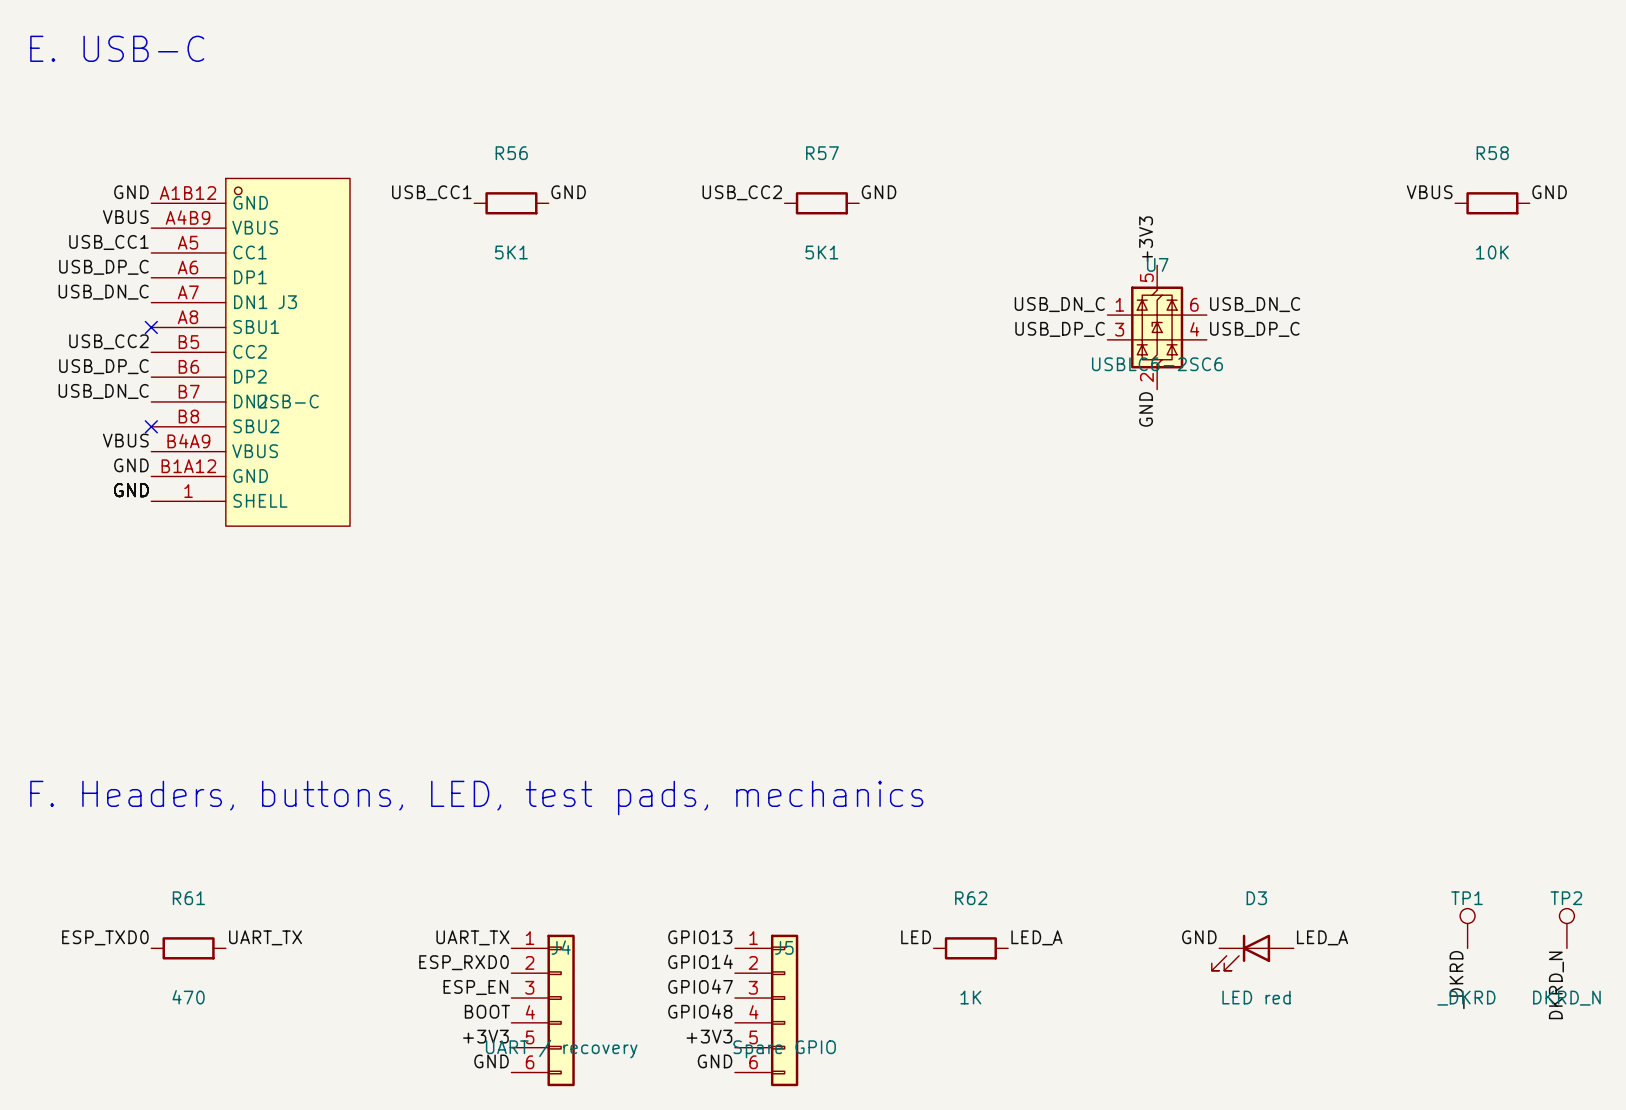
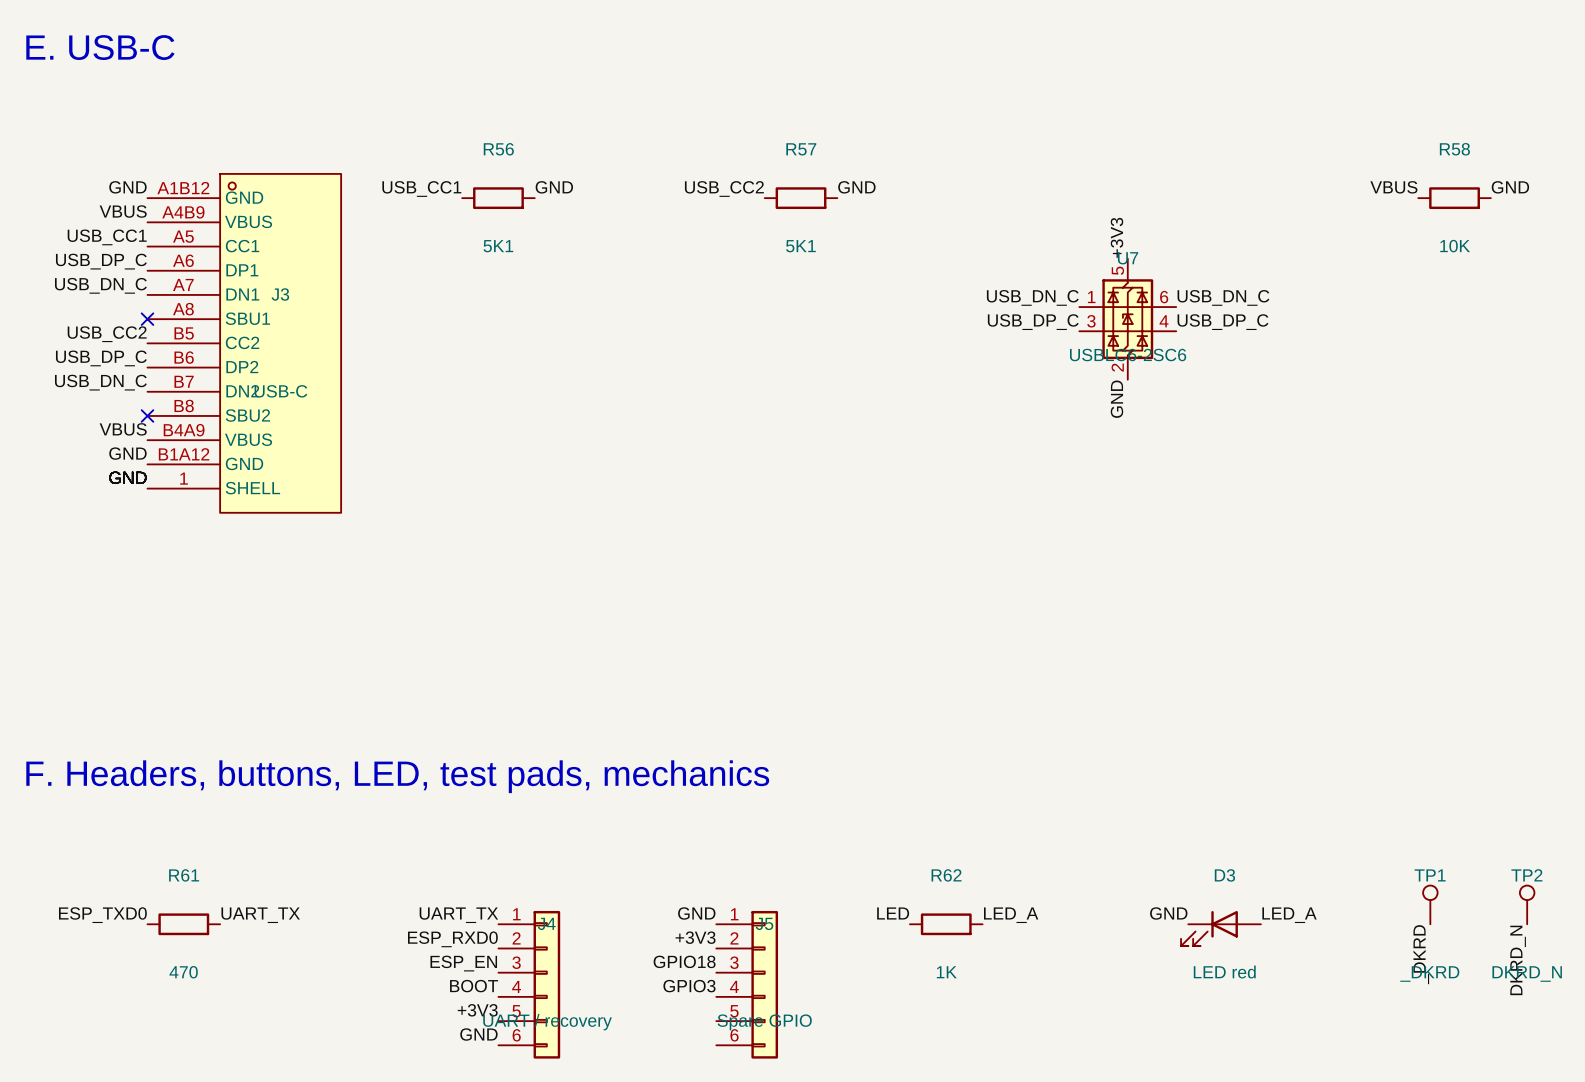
label: GPIO13 (700, 937) -> GND (696, 913)
label: GPIO14 (700, 961) -> +3V3 (695, 937)
label: GPIO47 (700, 986) -> GPIO18 (684, 961)
label: GPIO48 (700, 1011) -> GPIO3 (689, 986)
label: +3V3 (709, 1036) -> none
label: GND (715, 1061) -> none

